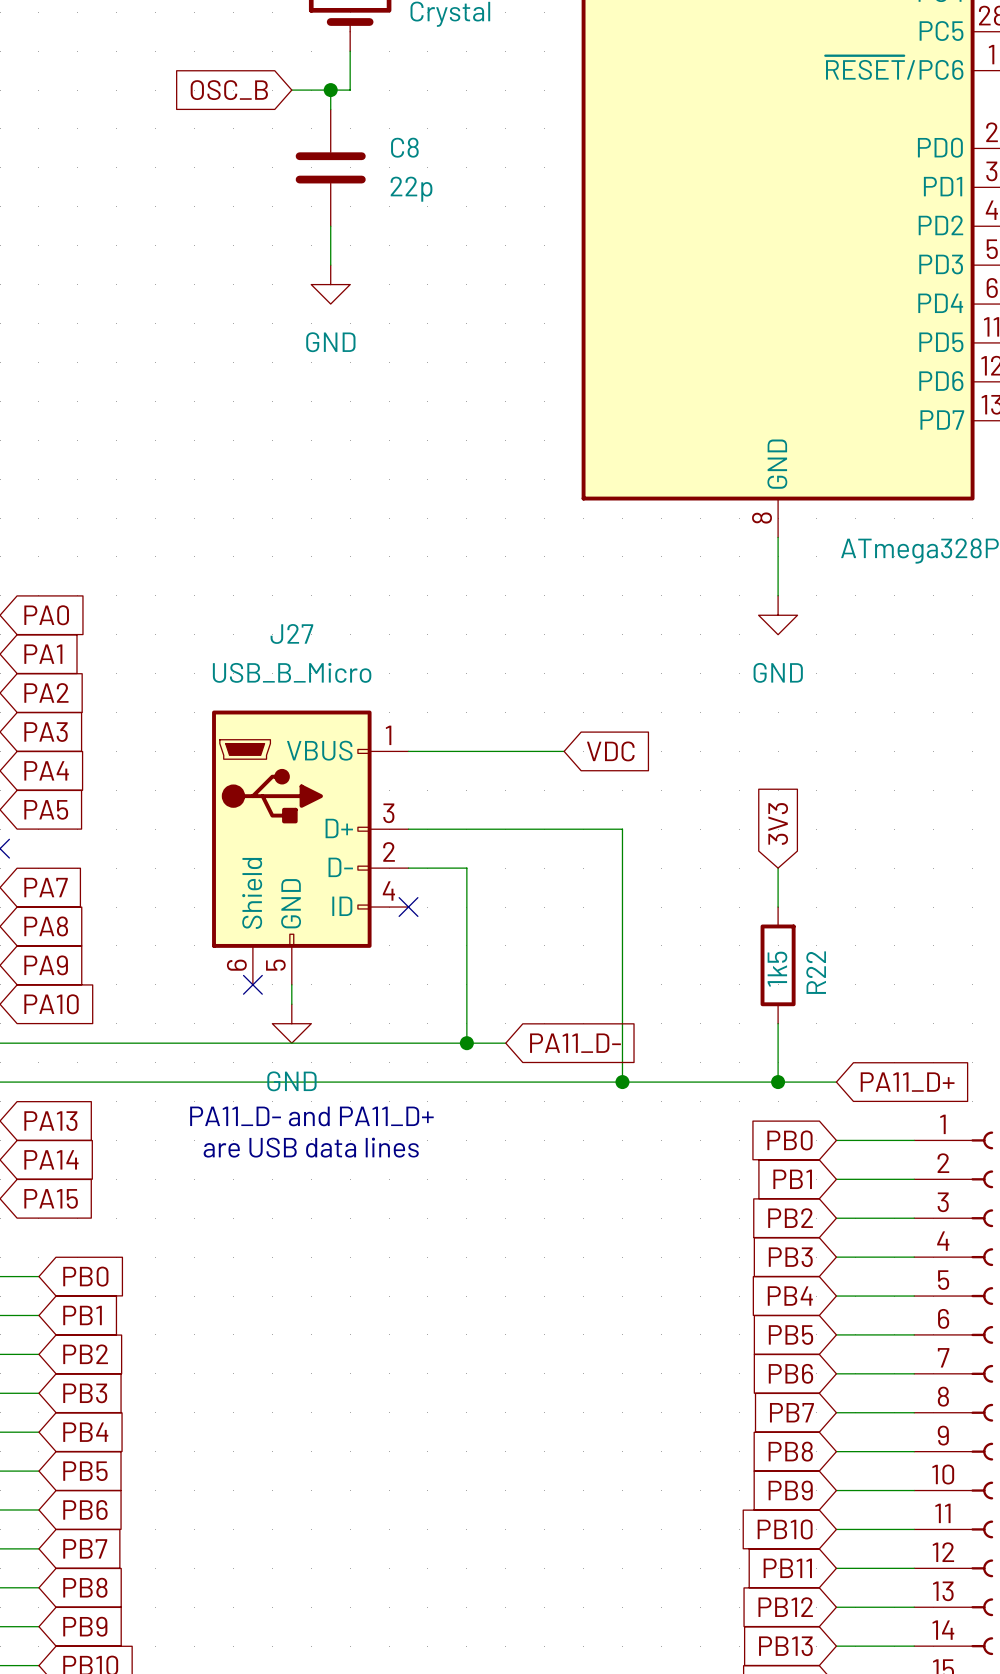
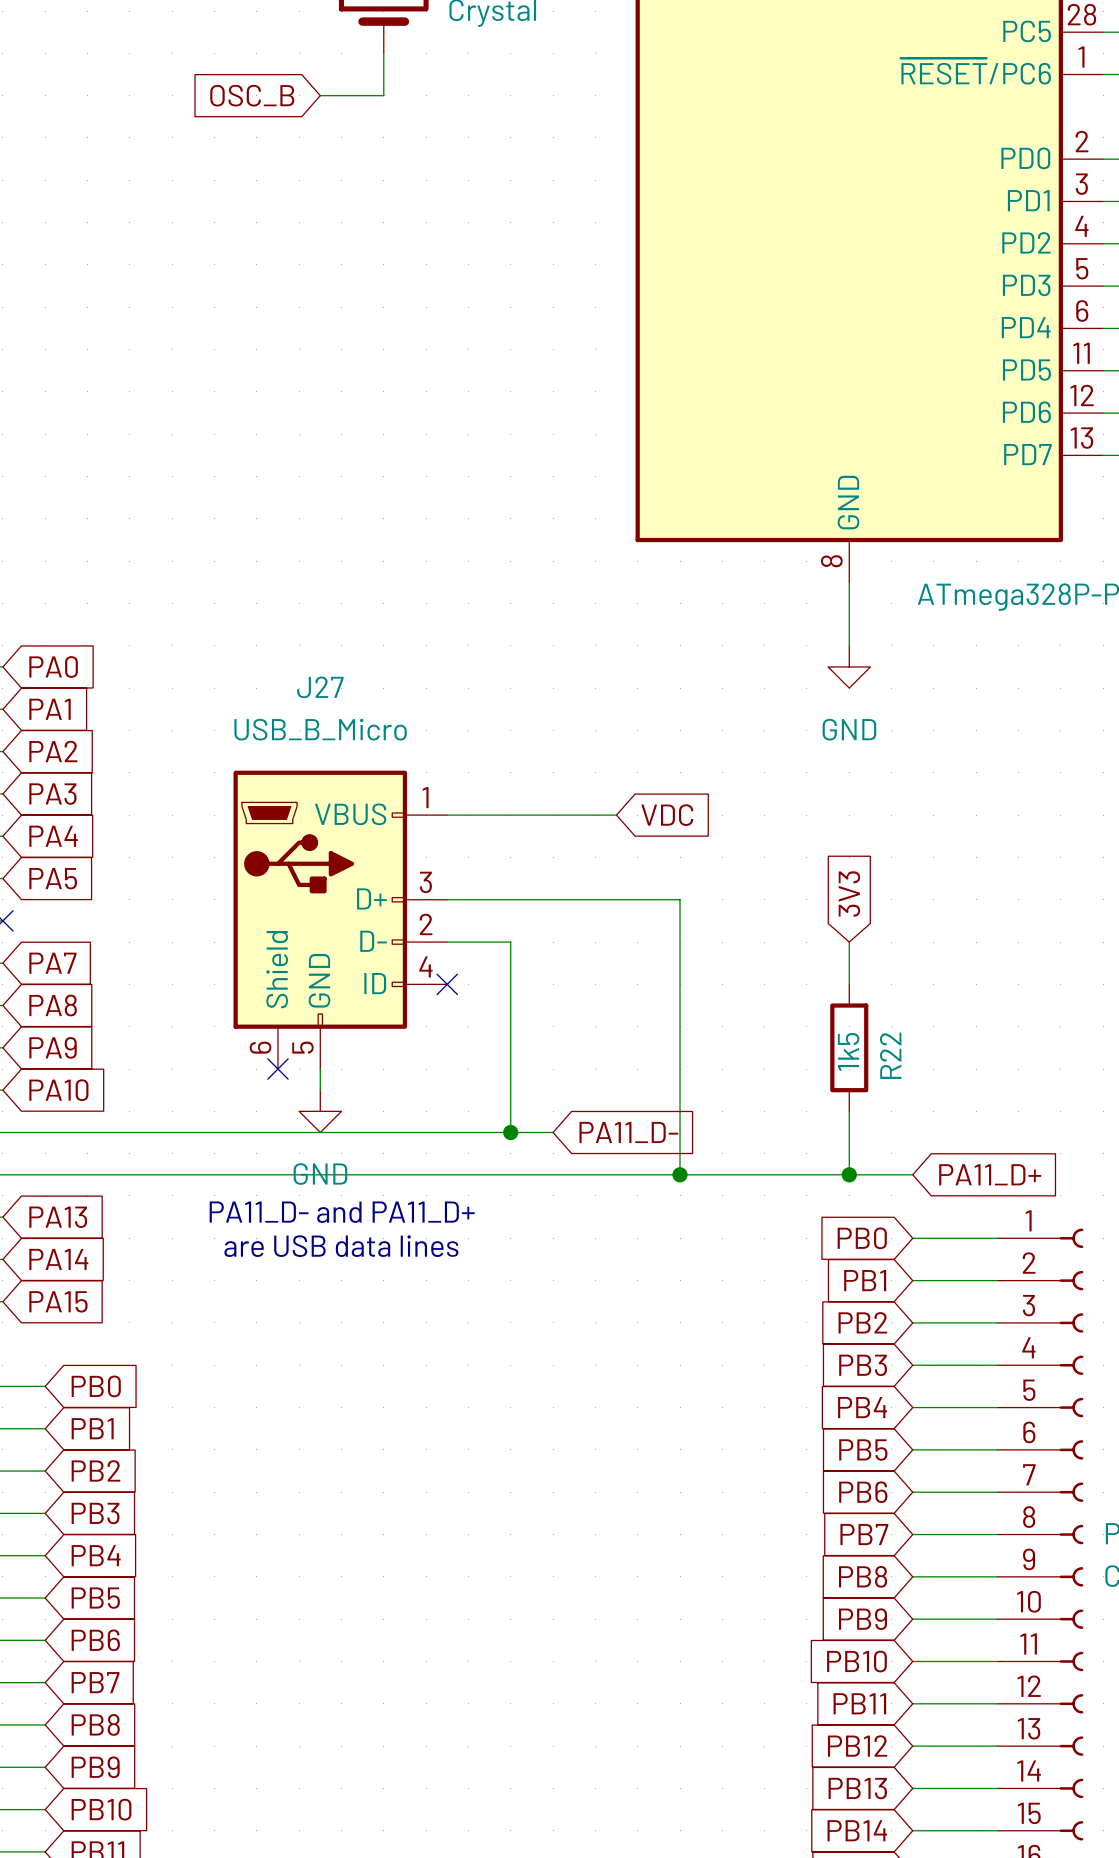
wire: (330, 90) (330, 109) -> none
junction: (330, 90) -> none
C8: 22p (330, 167) -> none
wire: (330, 226) (330, 265) -> none
power symbol: GND (330, 284) -> none

